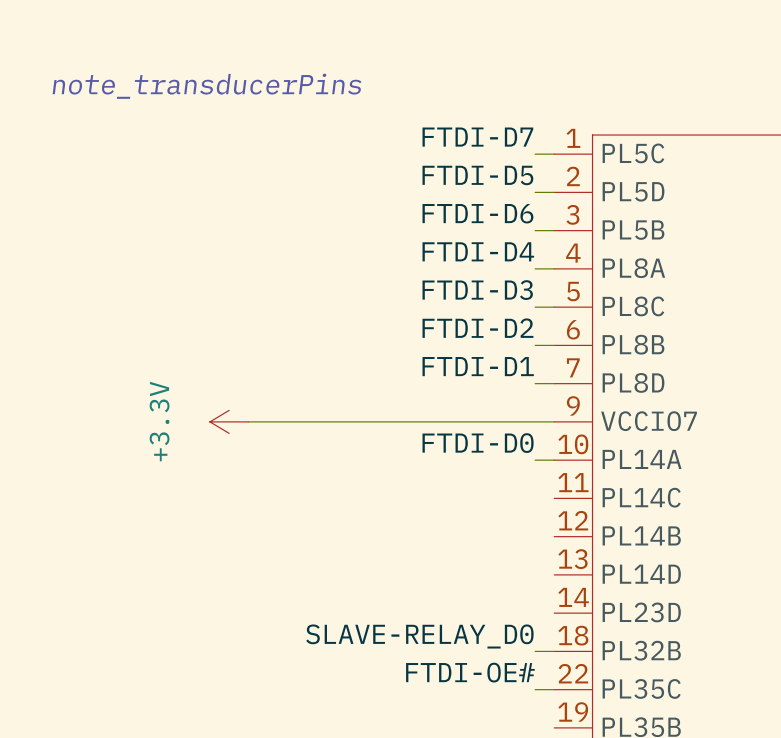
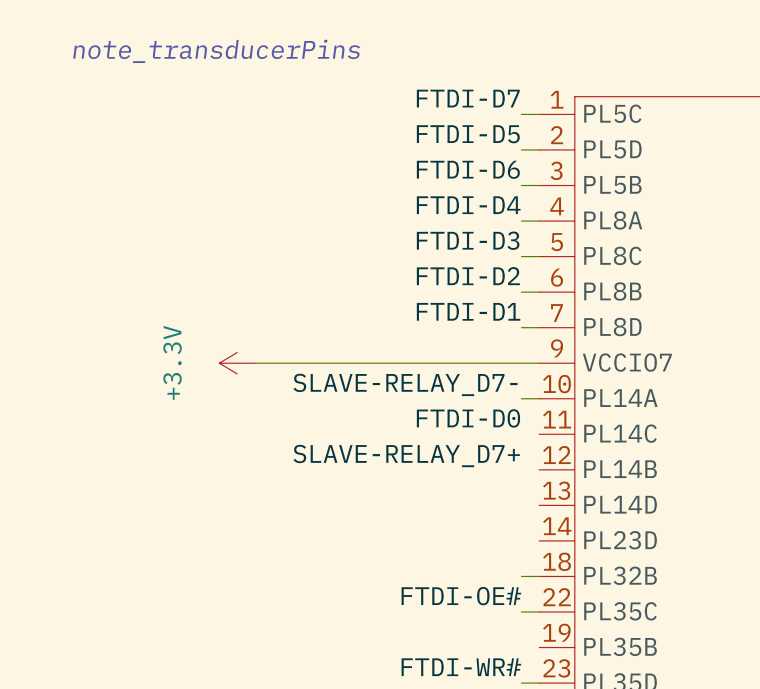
label: FTDI-D0 (478, 443) -> SLAVE-RELAY_D7- (405, 384)
label: none -> FTDI-D0 (468, 418)
label: none -> SLAVE-RELAY_D7+ (406, 455)
label: SLAVE-RELAY_D0 (419, 636) -> none

